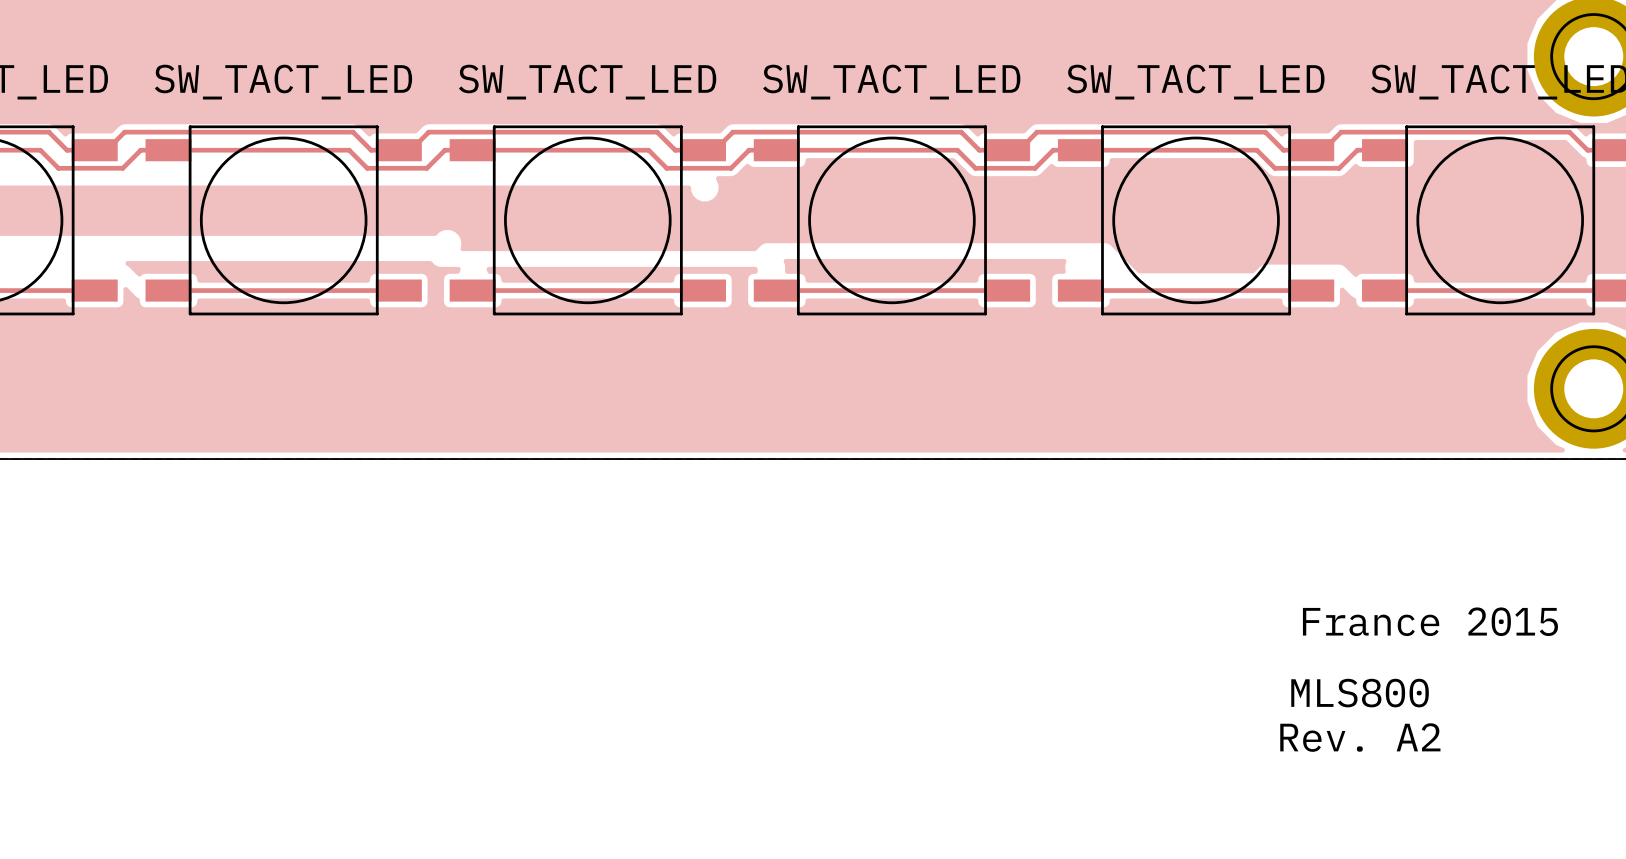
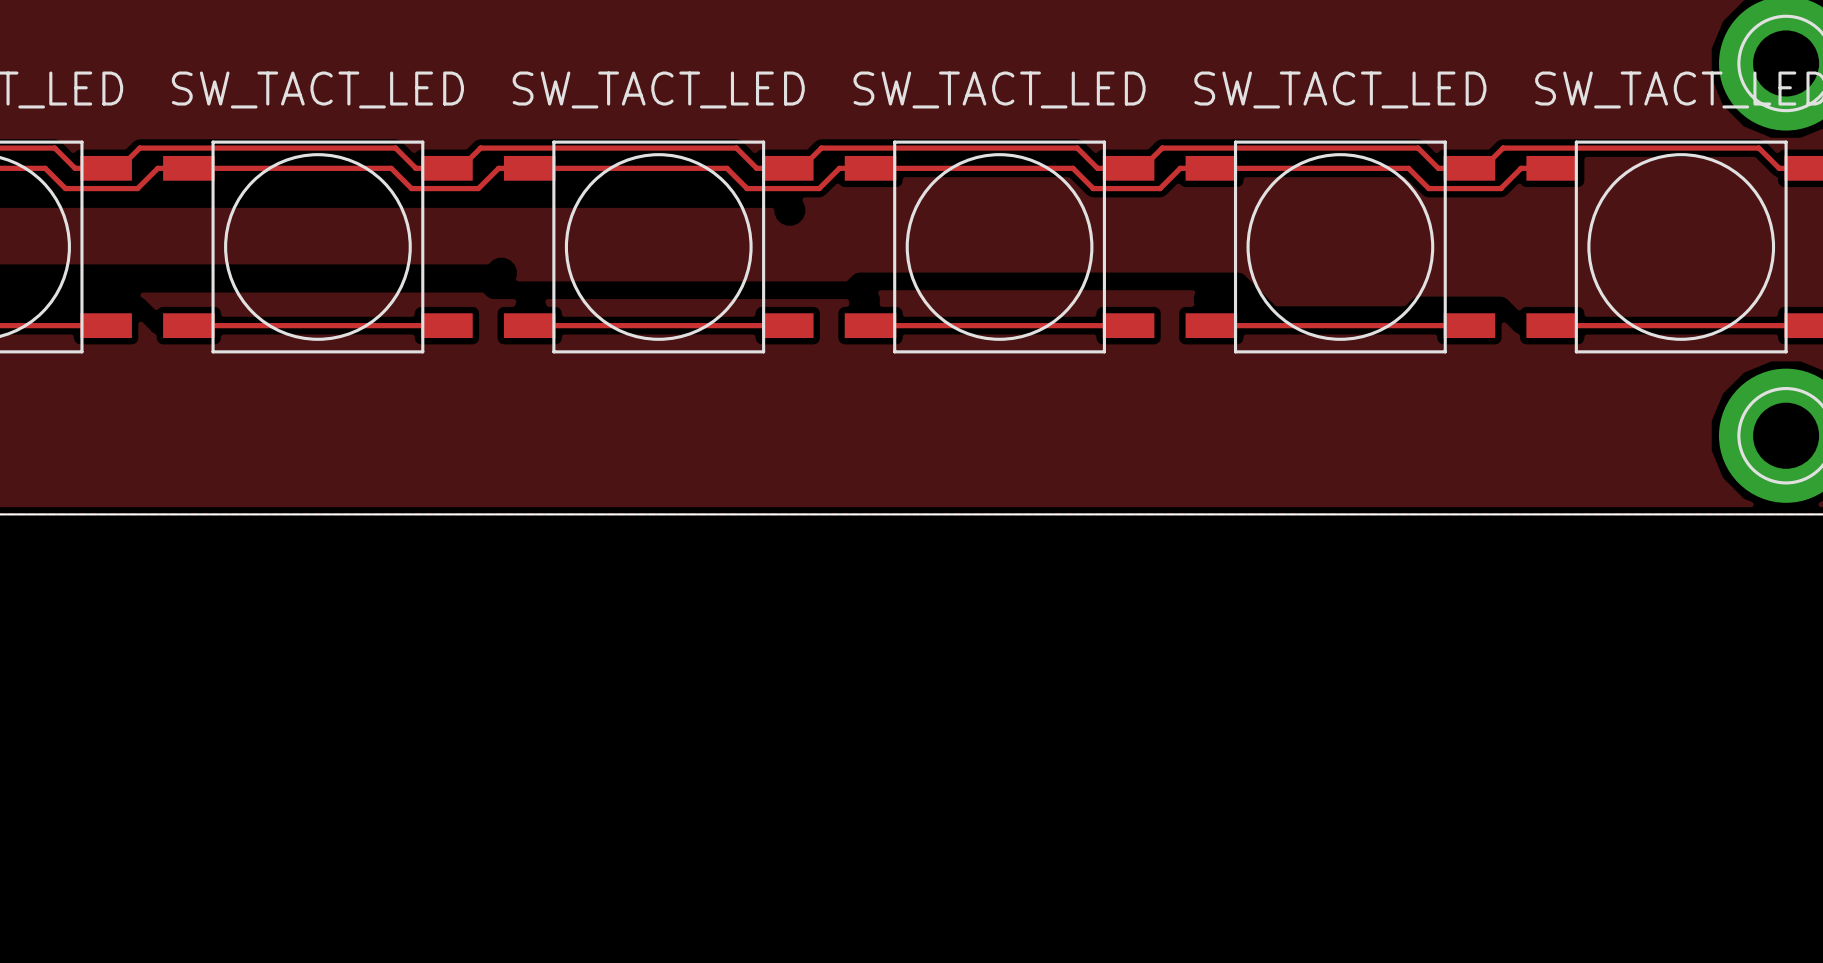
text: France 2015 (1430, 621) -> none
text: MLS800 (1360, 693) -> none
text: Rev. A2 (1360, 737) -> none

